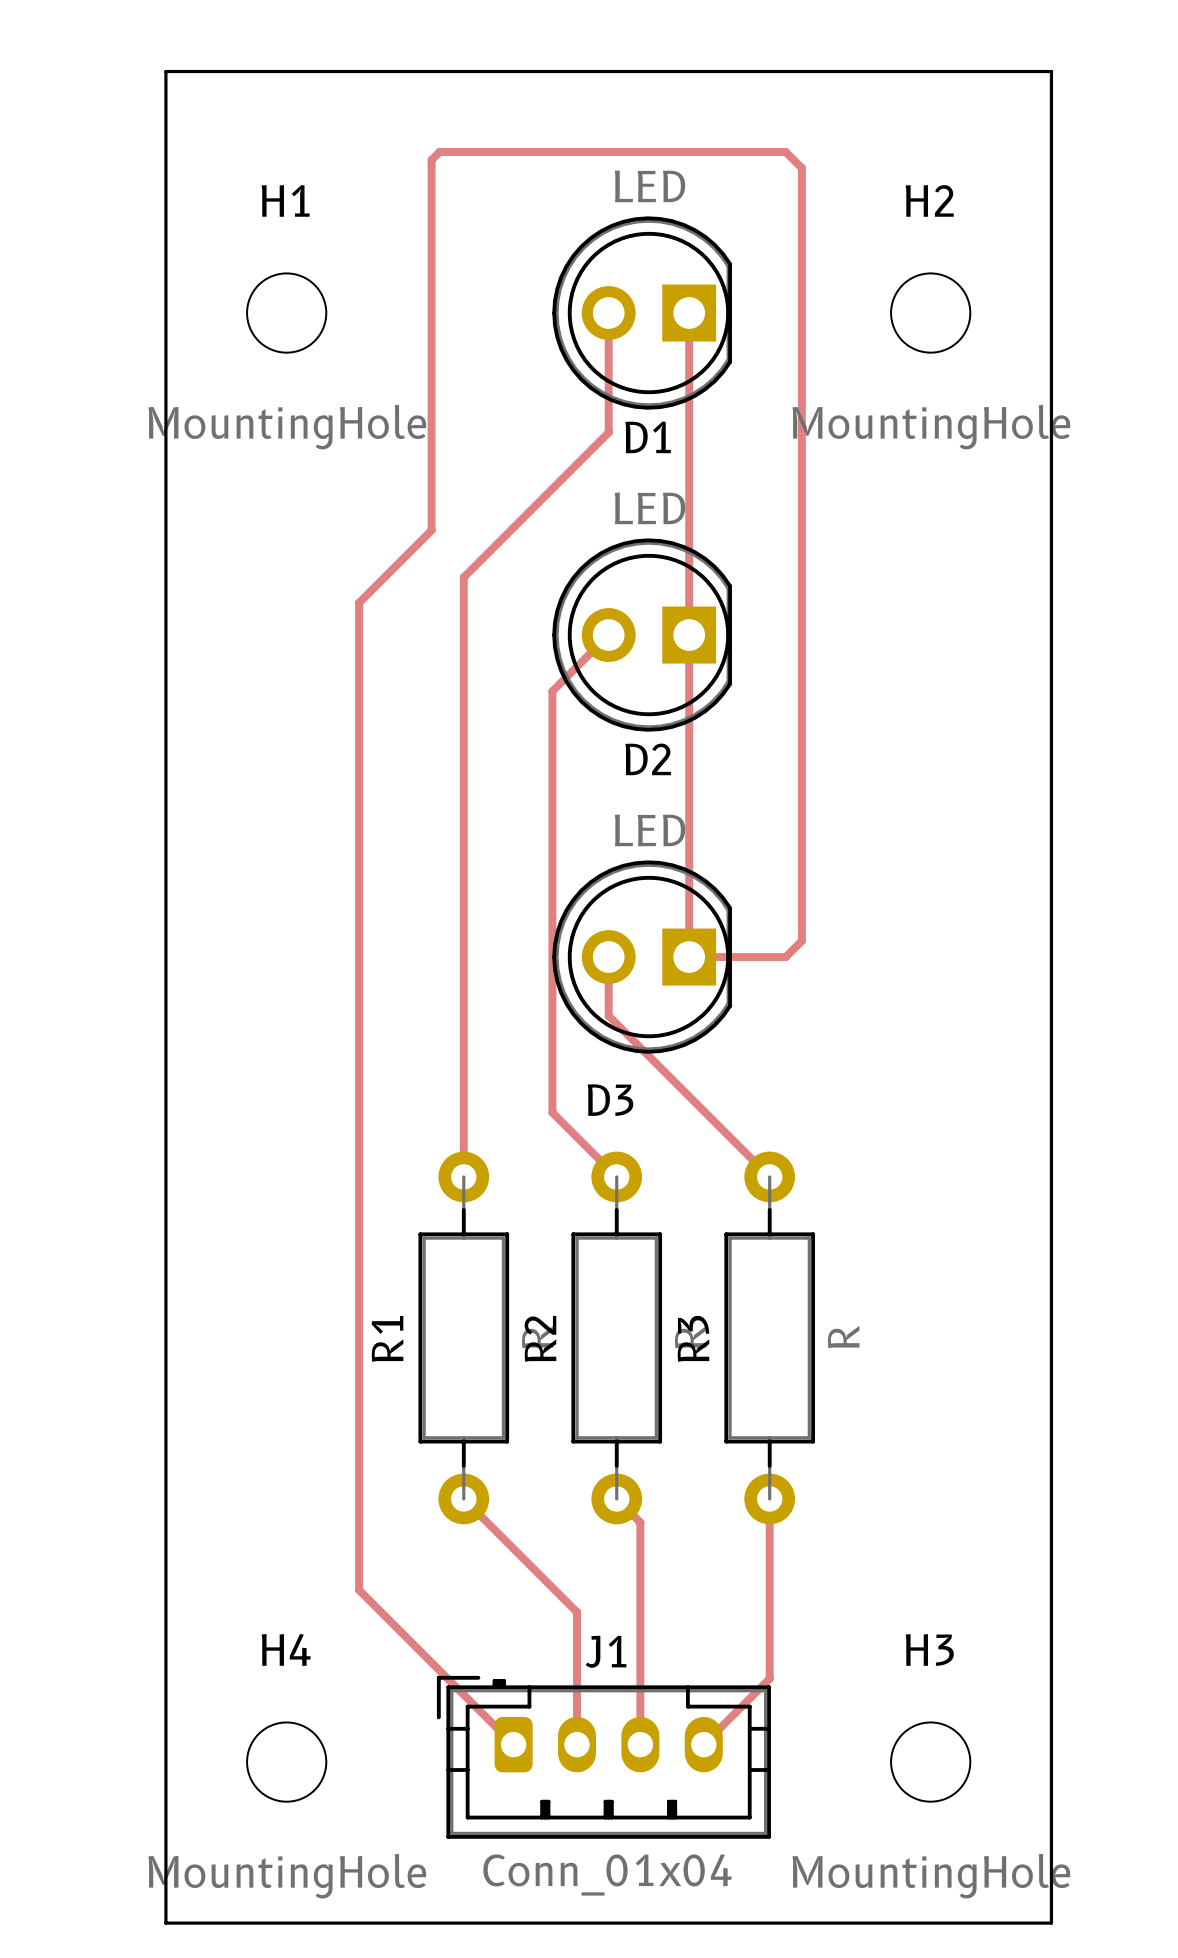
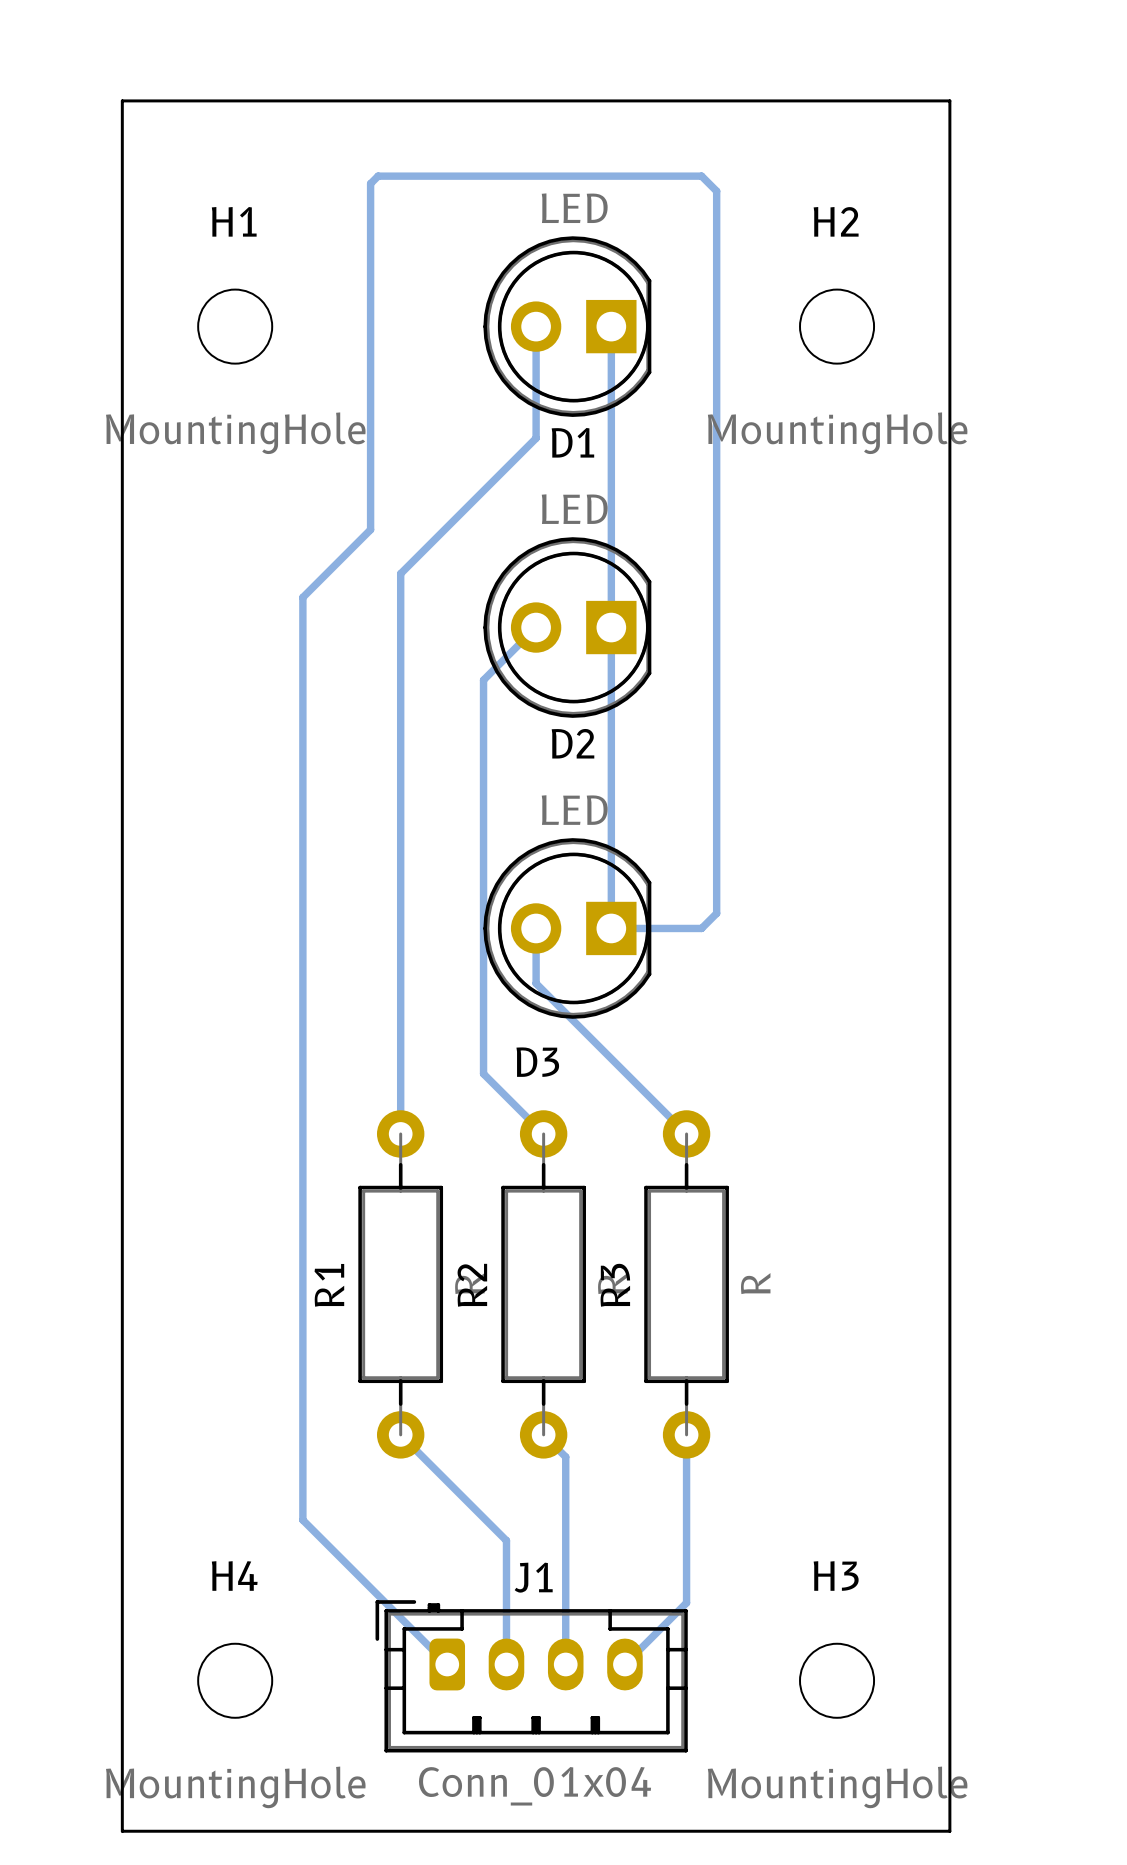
top track: (608, 313) (608, 432) (463, 577) (463, 1176) -> none
bottom track: none -> (536, 326) (536, 438) (400, 573) (400, 1133)
top track: (689, 313) (689, 957) (785, 957) (801, 940) (801, 168) (785, 152) (439, 152) (431, 160) (431, 530) (359, 602) (359, 1590) (513, 1744) -> none
bottom track: none -> (611, 326) (611, 928) (701, 928) (716, 913) (716, 191) (701, 176) (378, 176) (370, 183) (370, 529) (302, 597) (302, 1520) (447, 1664)
top track: (608, 635) (552, 691) (552, 1112) (616, 1176) -> none
bottom track: none -> (536, 627) (483, 680) (483, 1073) (543, 1133)
top track: (608, 957) (608, 1015) (769, 1176) -> none
bottom track: none -> (536, 928) (536, 983) (686, 1133)
top track: (463, 1498) (576, 1612) (576, 1744) -> none
bottom track: none -> (400, 1434) (506, 1540) (506, 1664)
top track: (616, 1498) (640, 1522) (640, 1744) -> none
bottom track: none -> (543, 1434) (565, 1456) (565, 1664)
top track: (769, 1498) (769, 1678) (703, 1744) -> none
bottom track: none -> (686, 1434) (686, 1602) (624, 1664)

